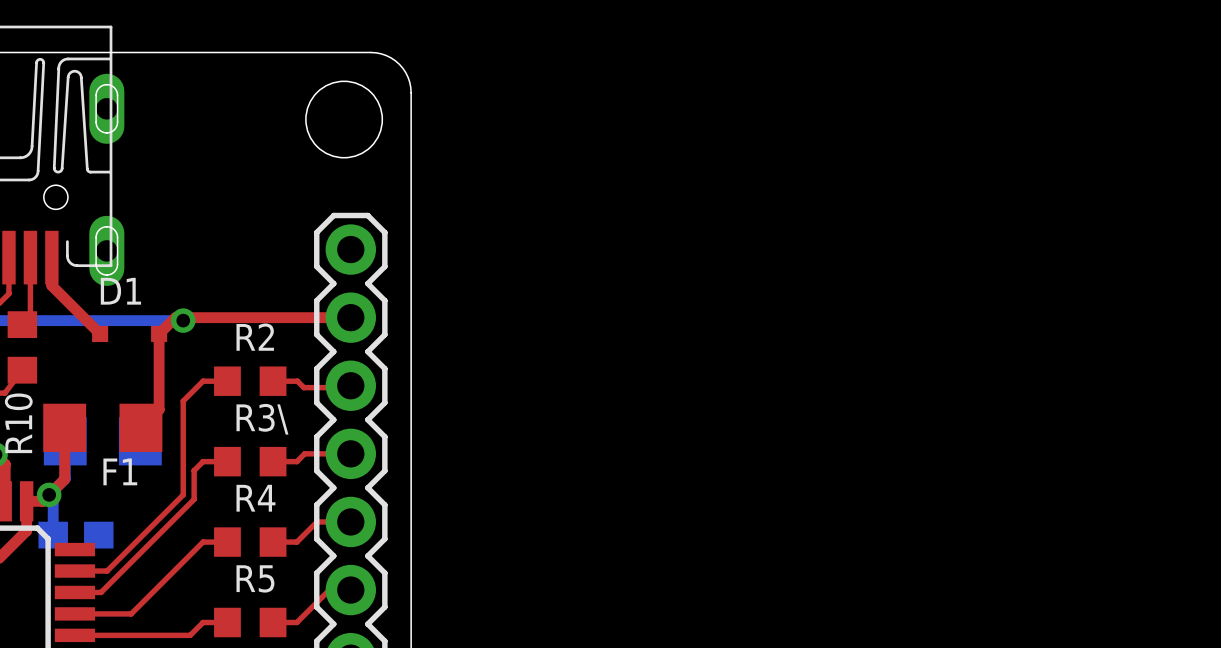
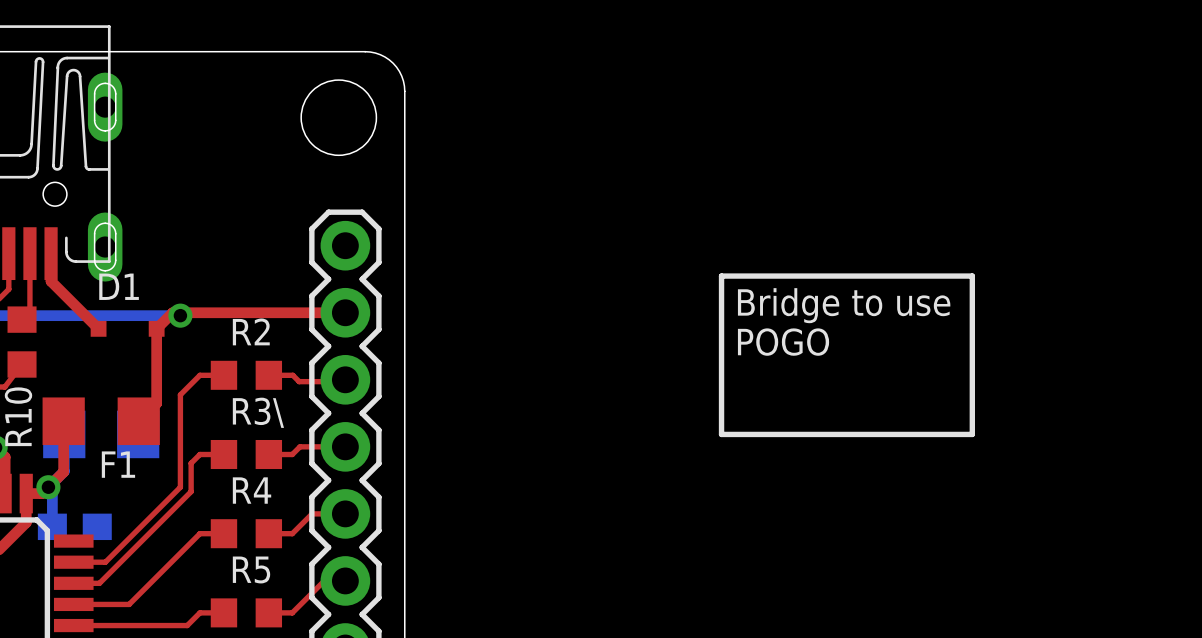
line: none -> (721, 276) (972, 276) (972, 434) (721, 434) (721, 276)
text: none -> Bridge to use (844, 305)
text: none -> POGO (783, 342)

